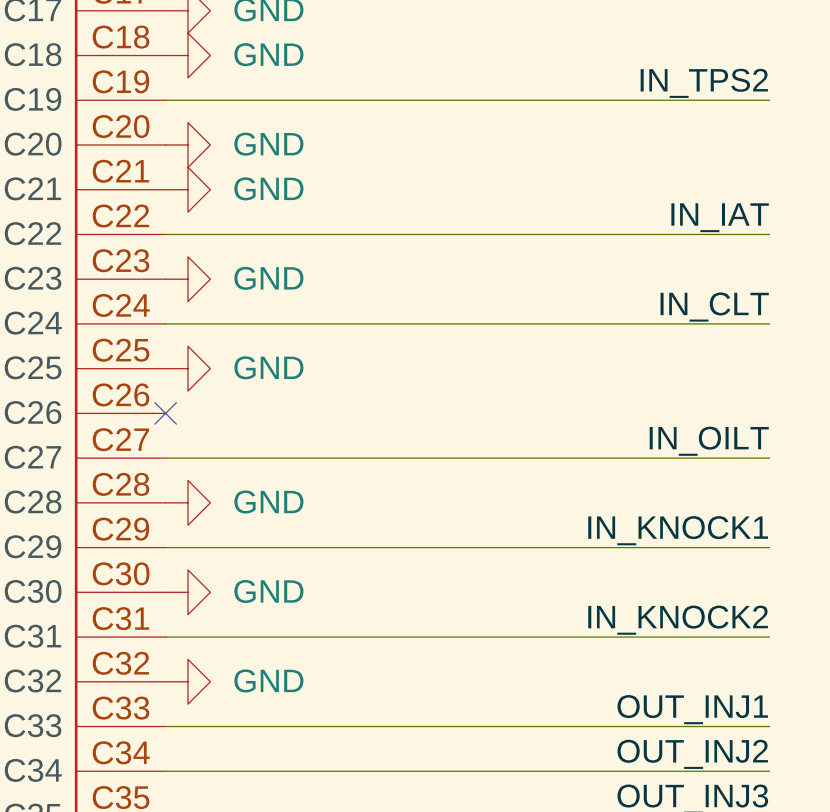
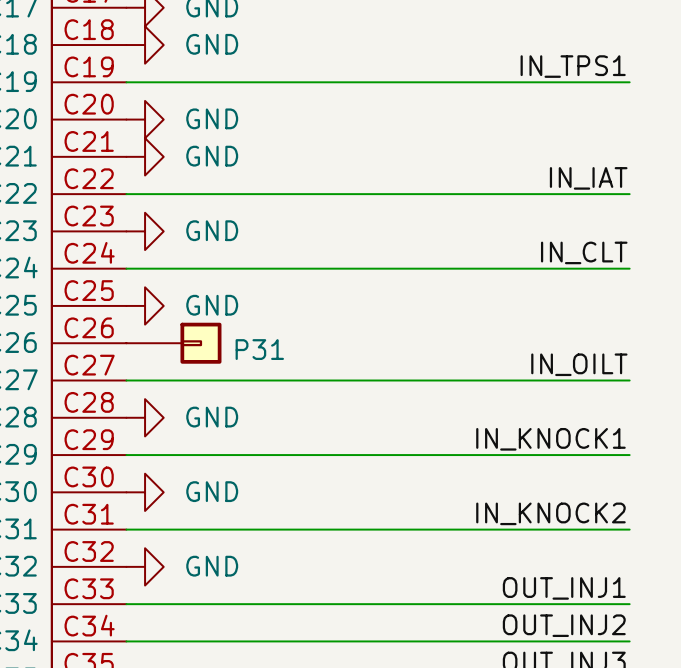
label: IN_TPS2 (704, 83) -> IN_TPS1 (573, 66)
no-connect mark: (165, 413) -> none
P31: none -> (173, 343)

